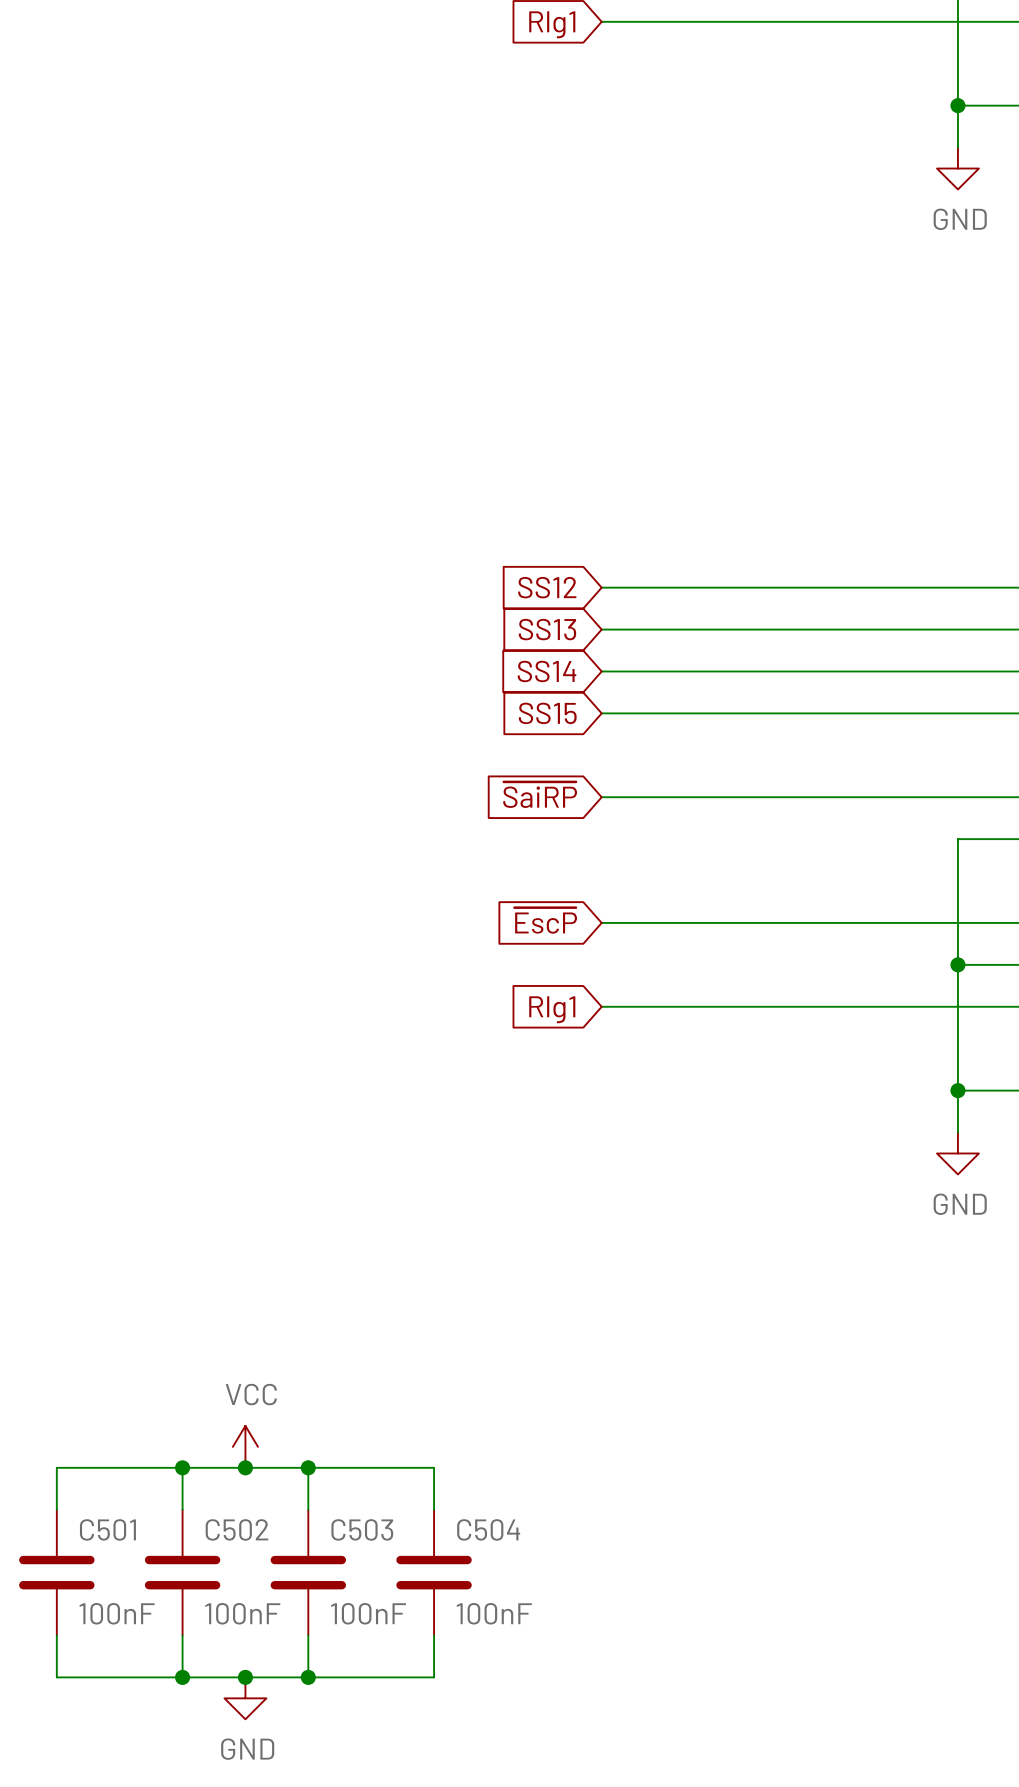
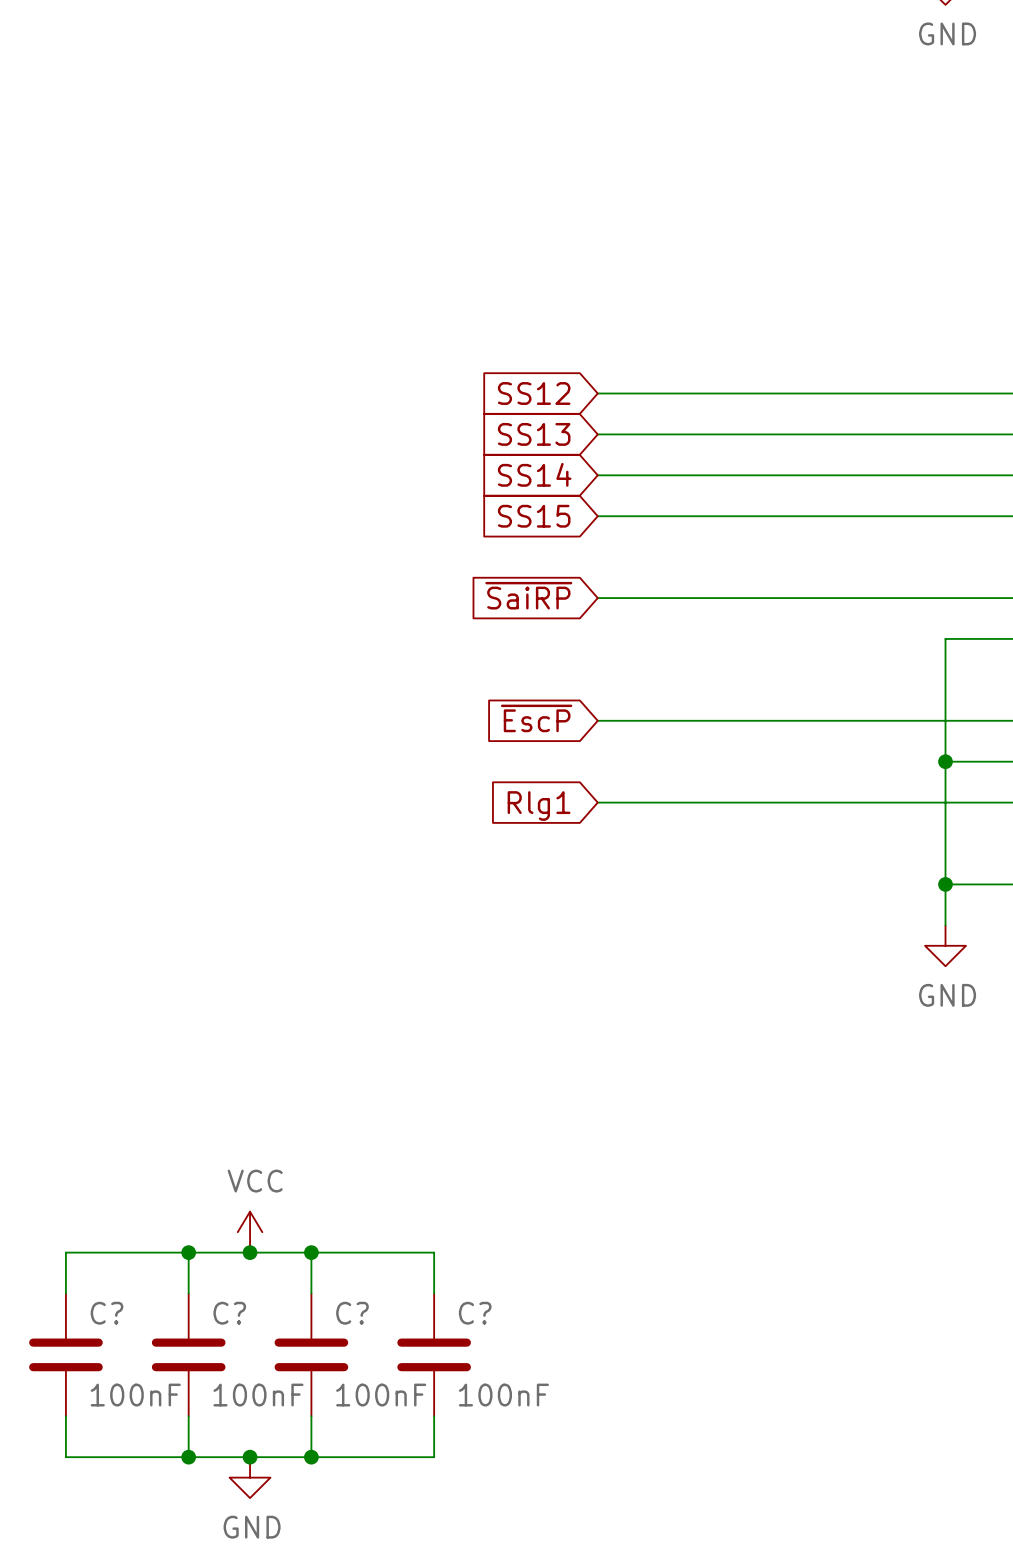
C501 name: C501 (107, 1529) -> C? (107, 1313)
C502 name: C502 (236, 1529) -> C? (229, 1313)
C503 name: C503 (362, 1529) -> C? (352, 1313)
C504 name: C504 (488, 1529) -> C? (475, 1313)

